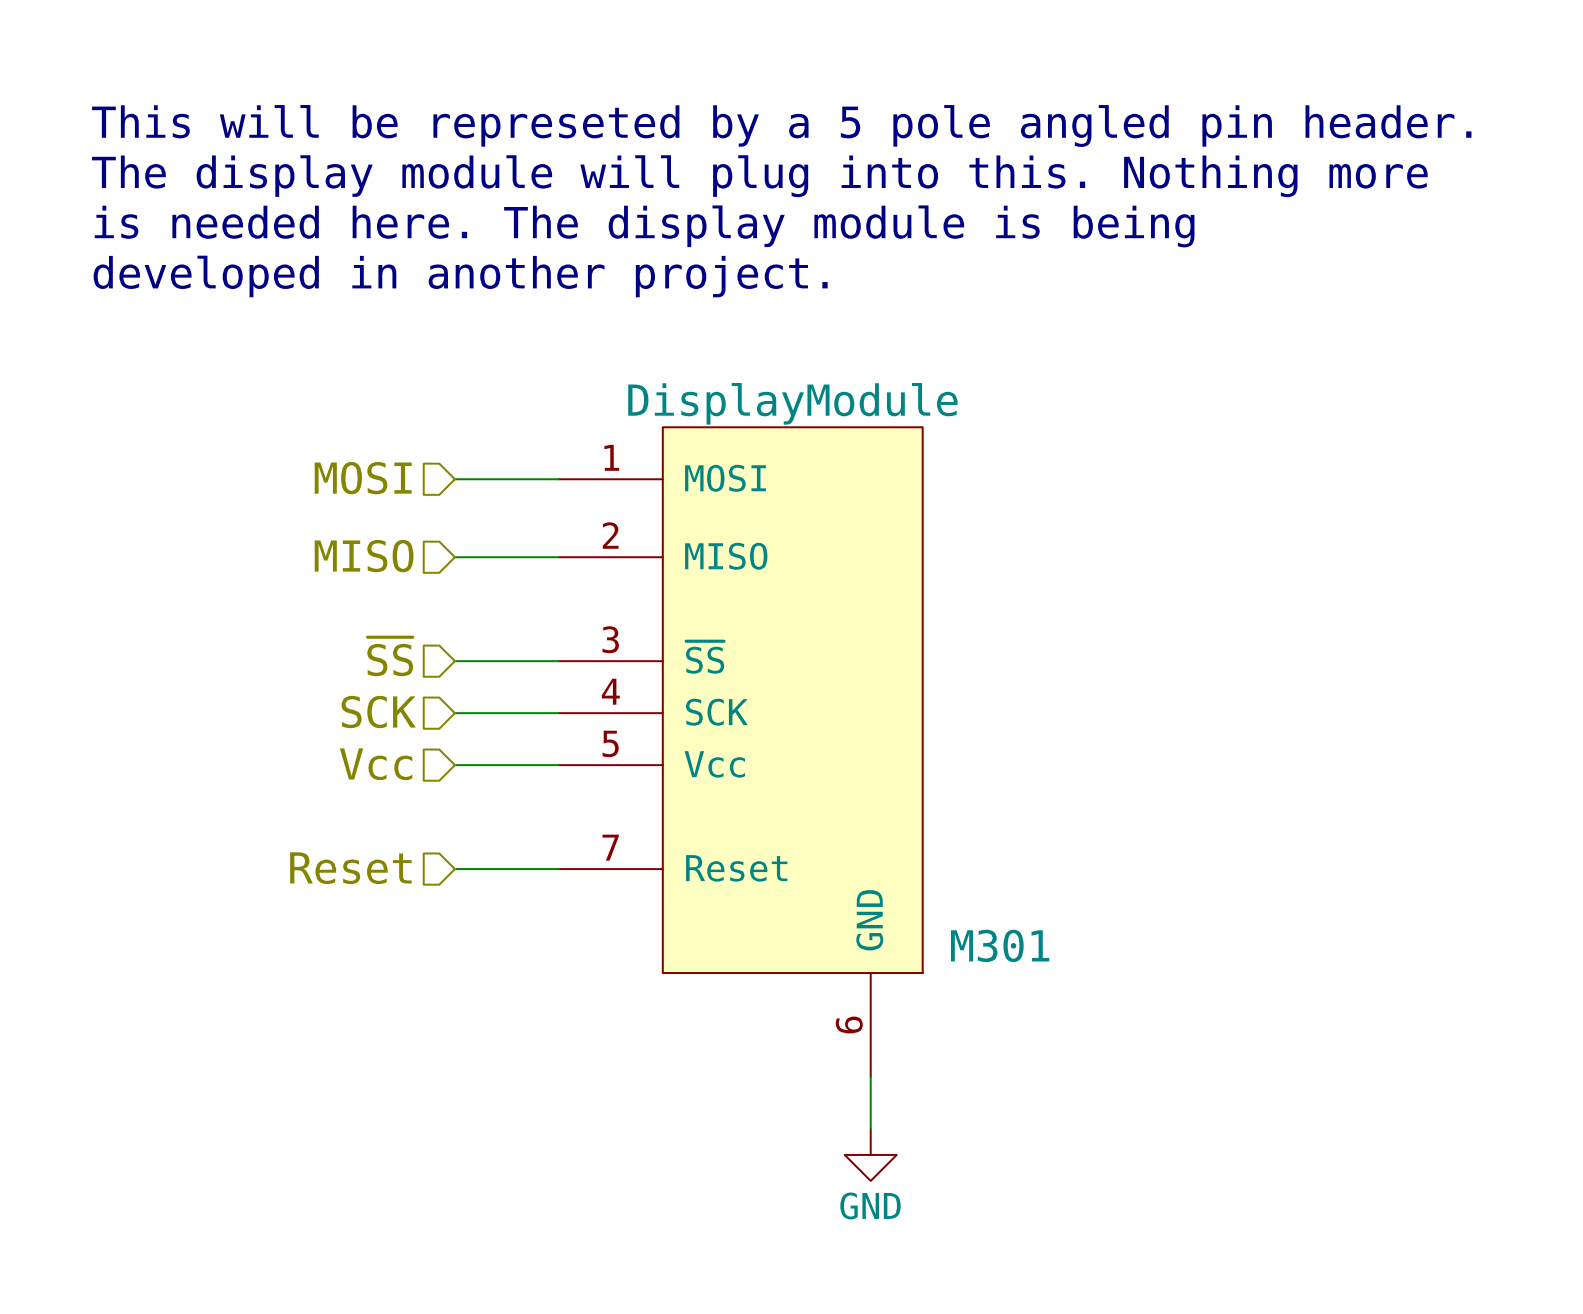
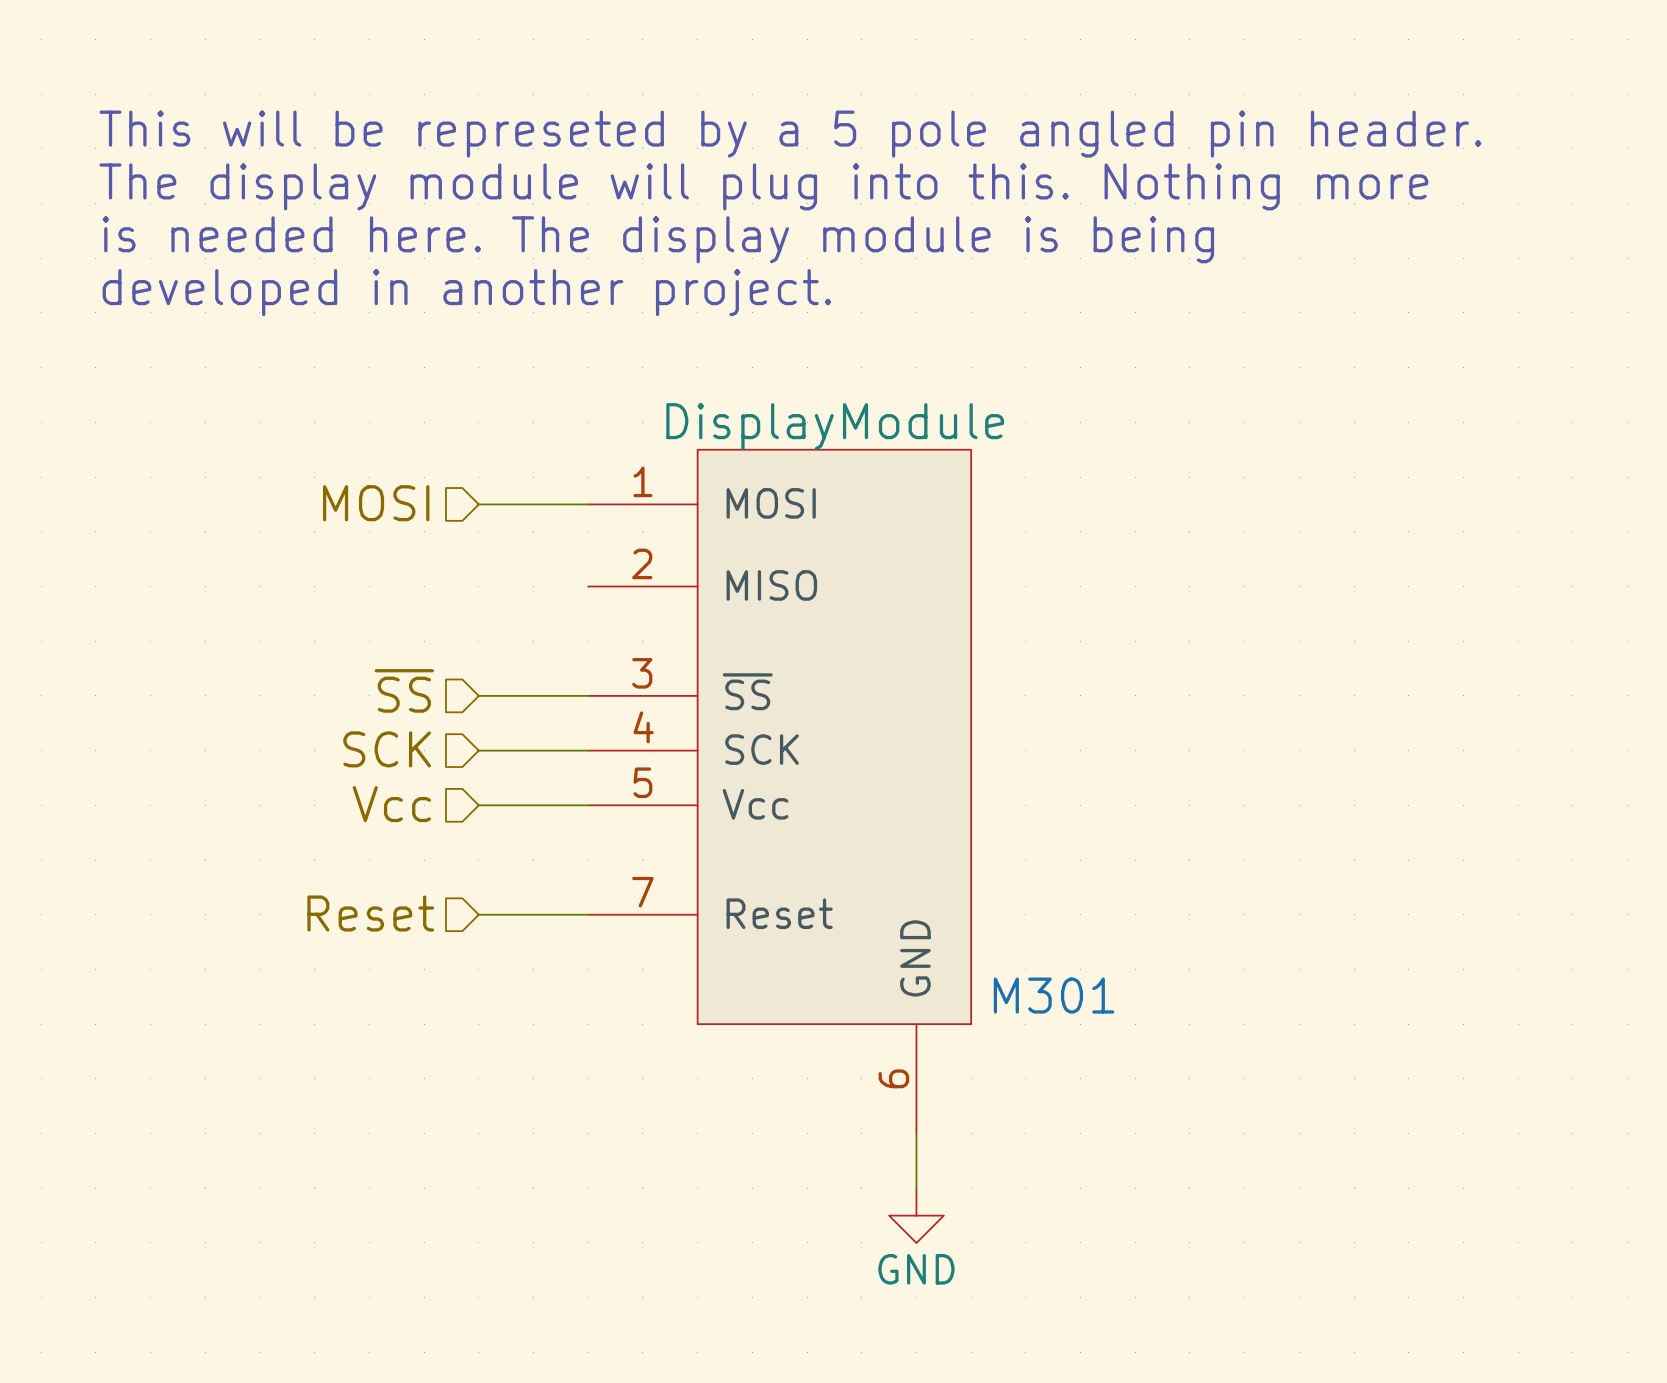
hierarchical label: MISO (364, 556) -> none
wire: (454, 557) (558, 557) -> none

